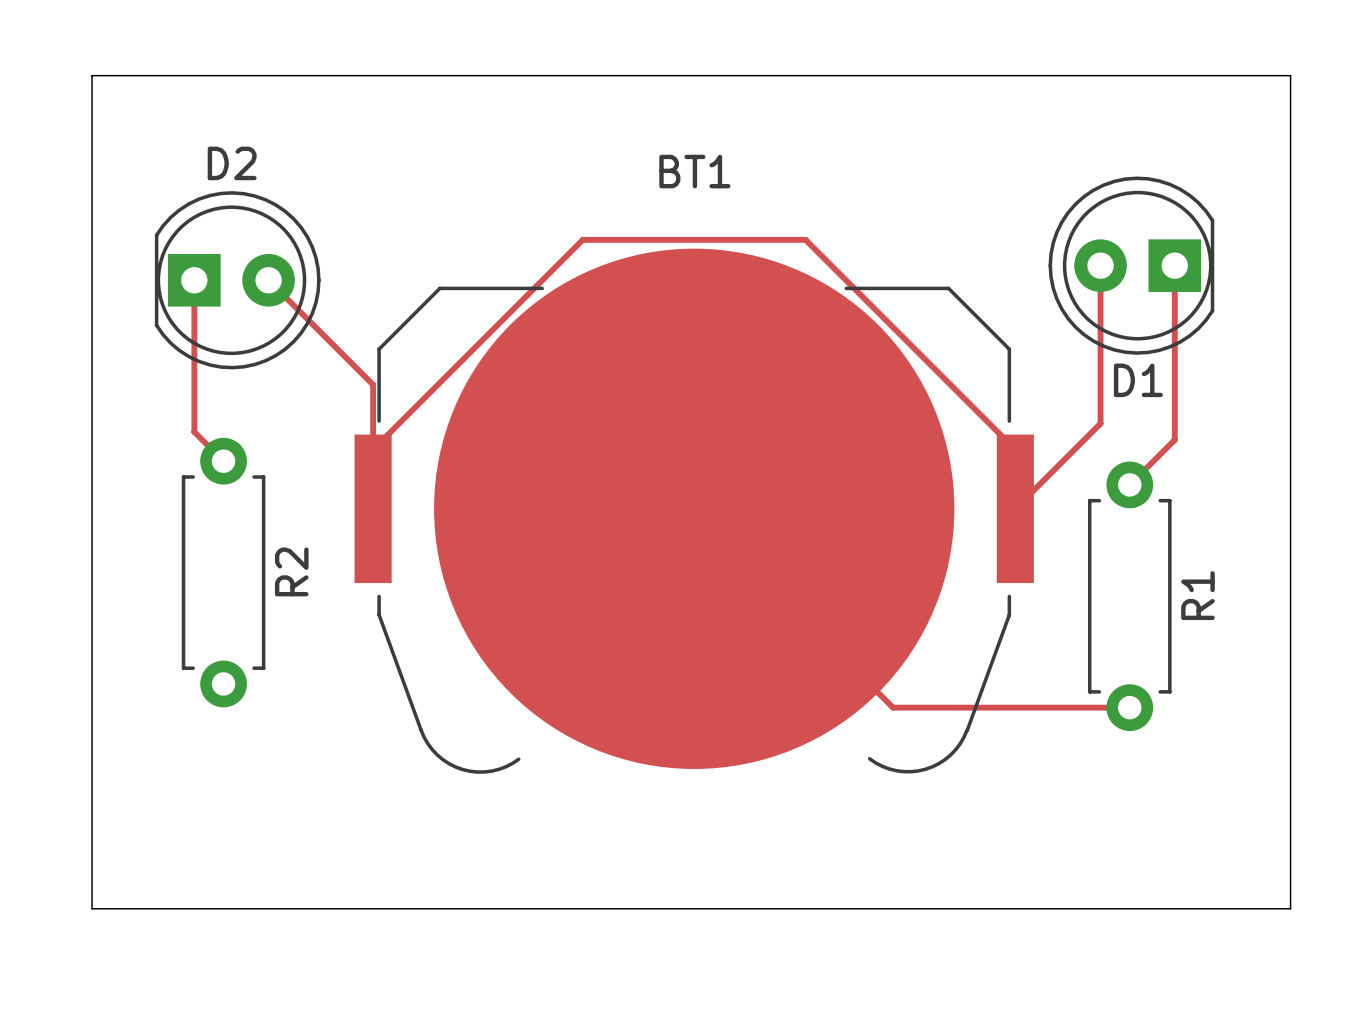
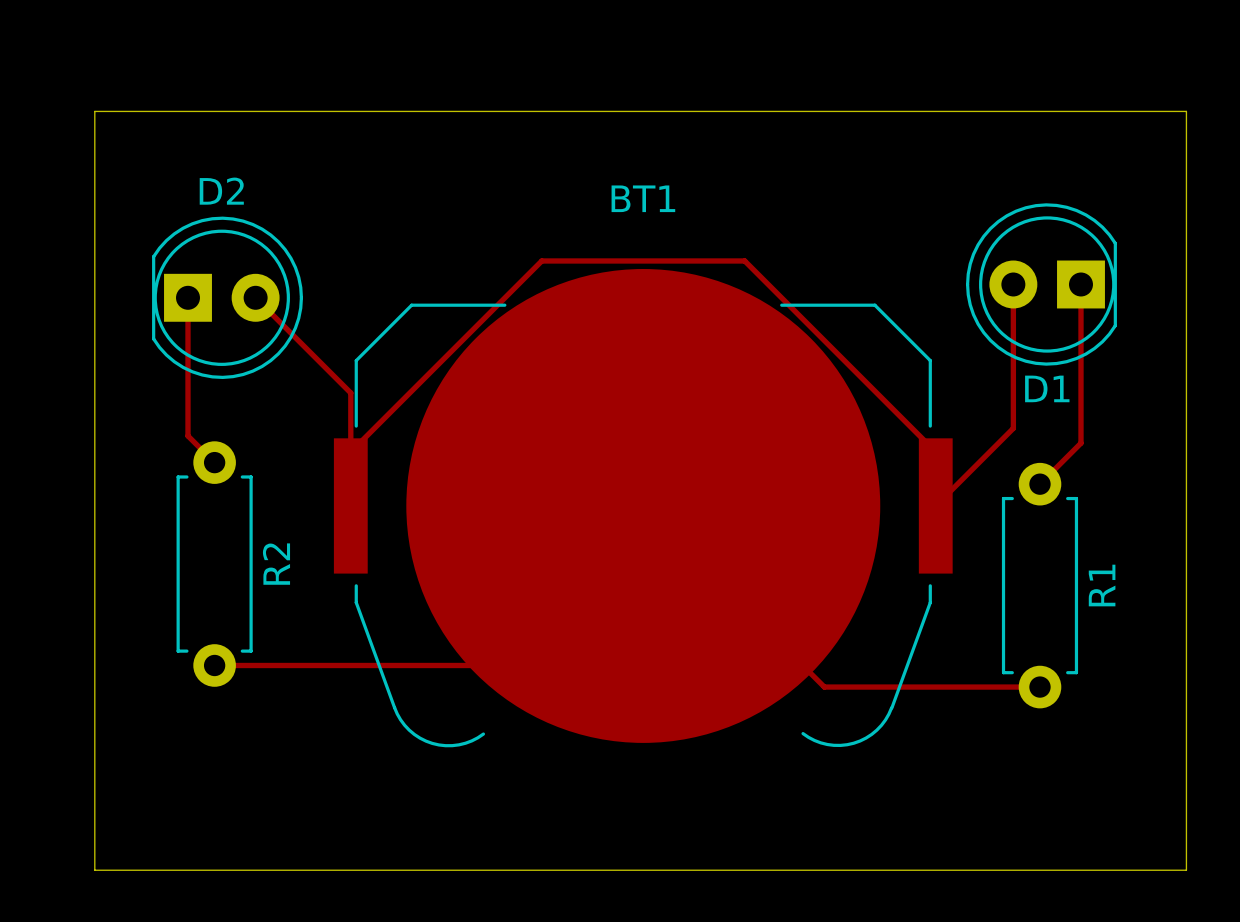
top track: none -> (643, 505) (483, 665) (214, 665)

